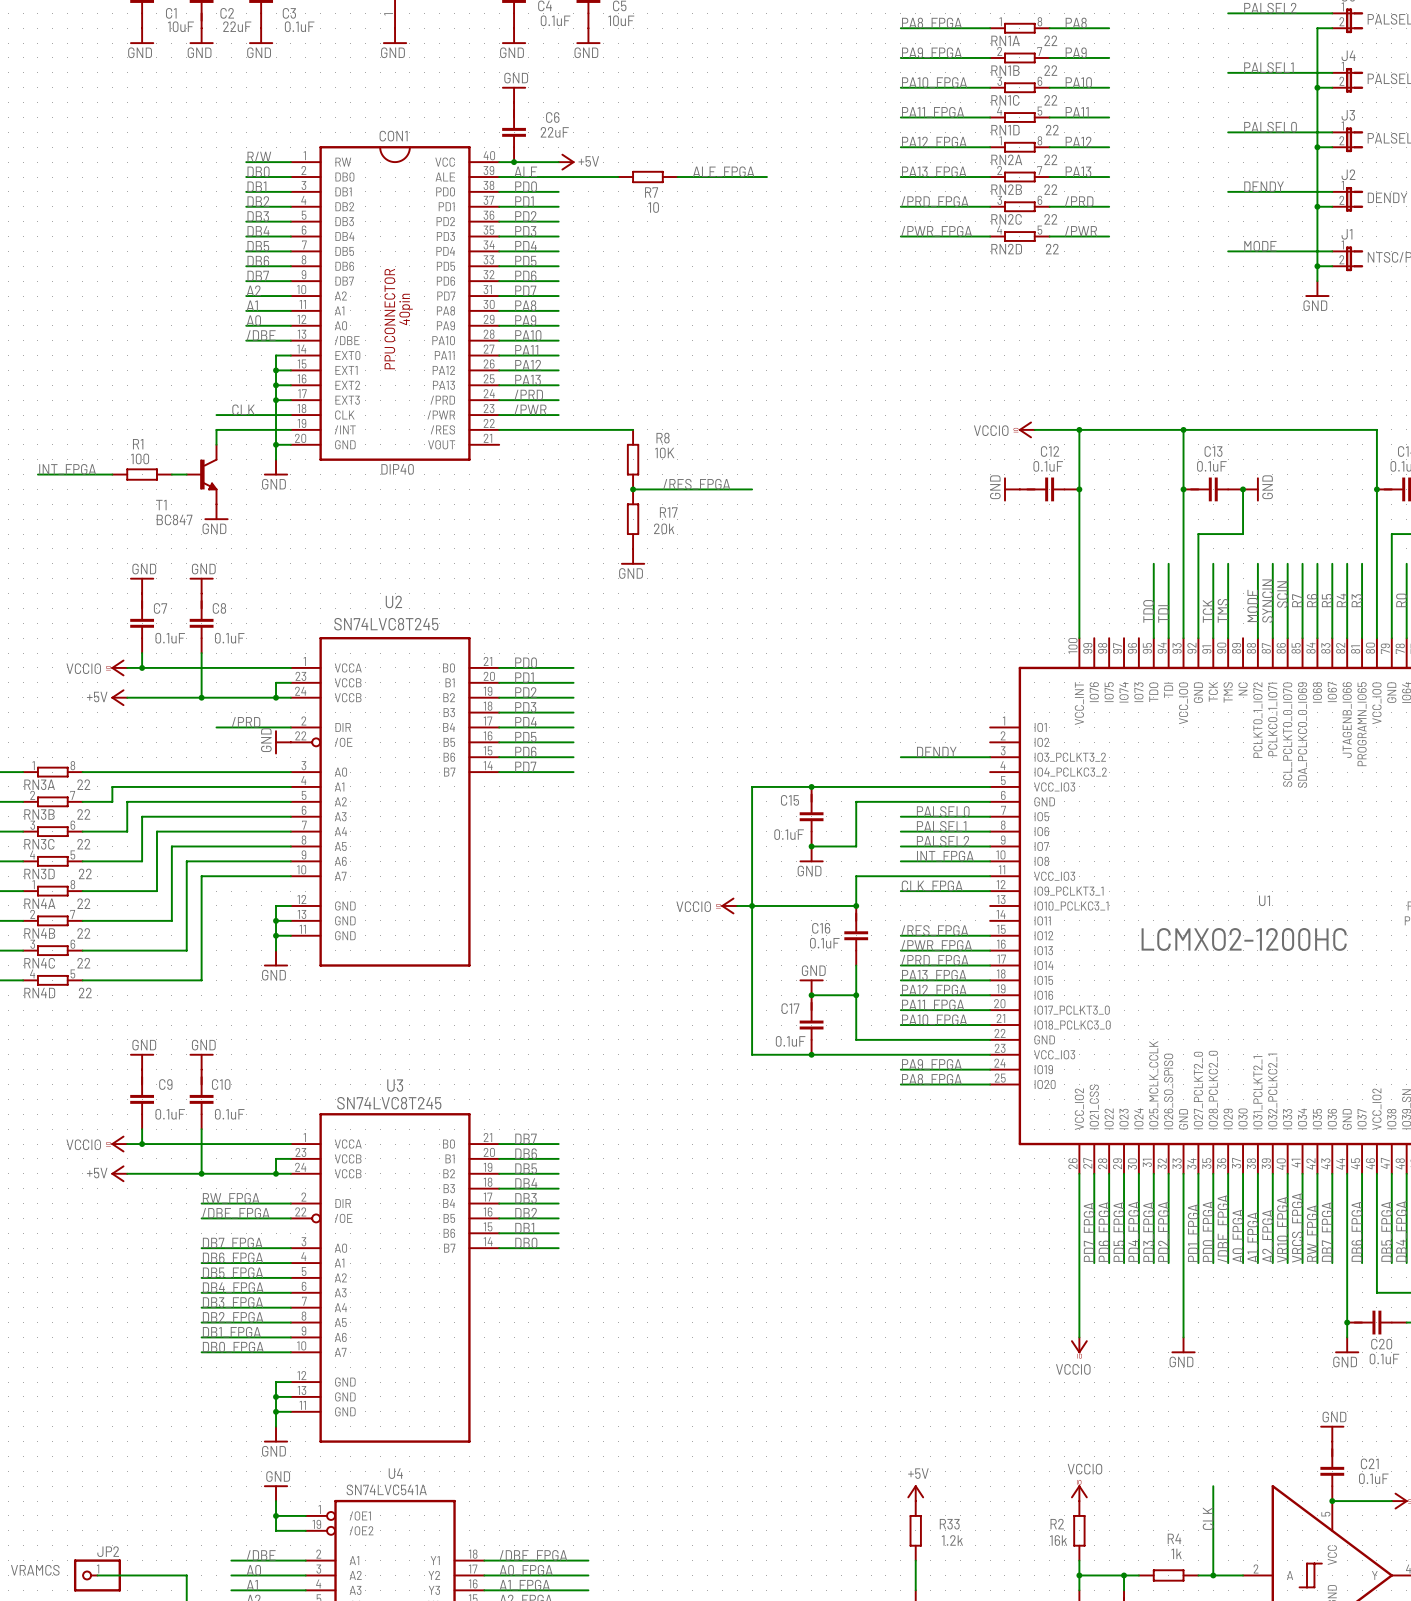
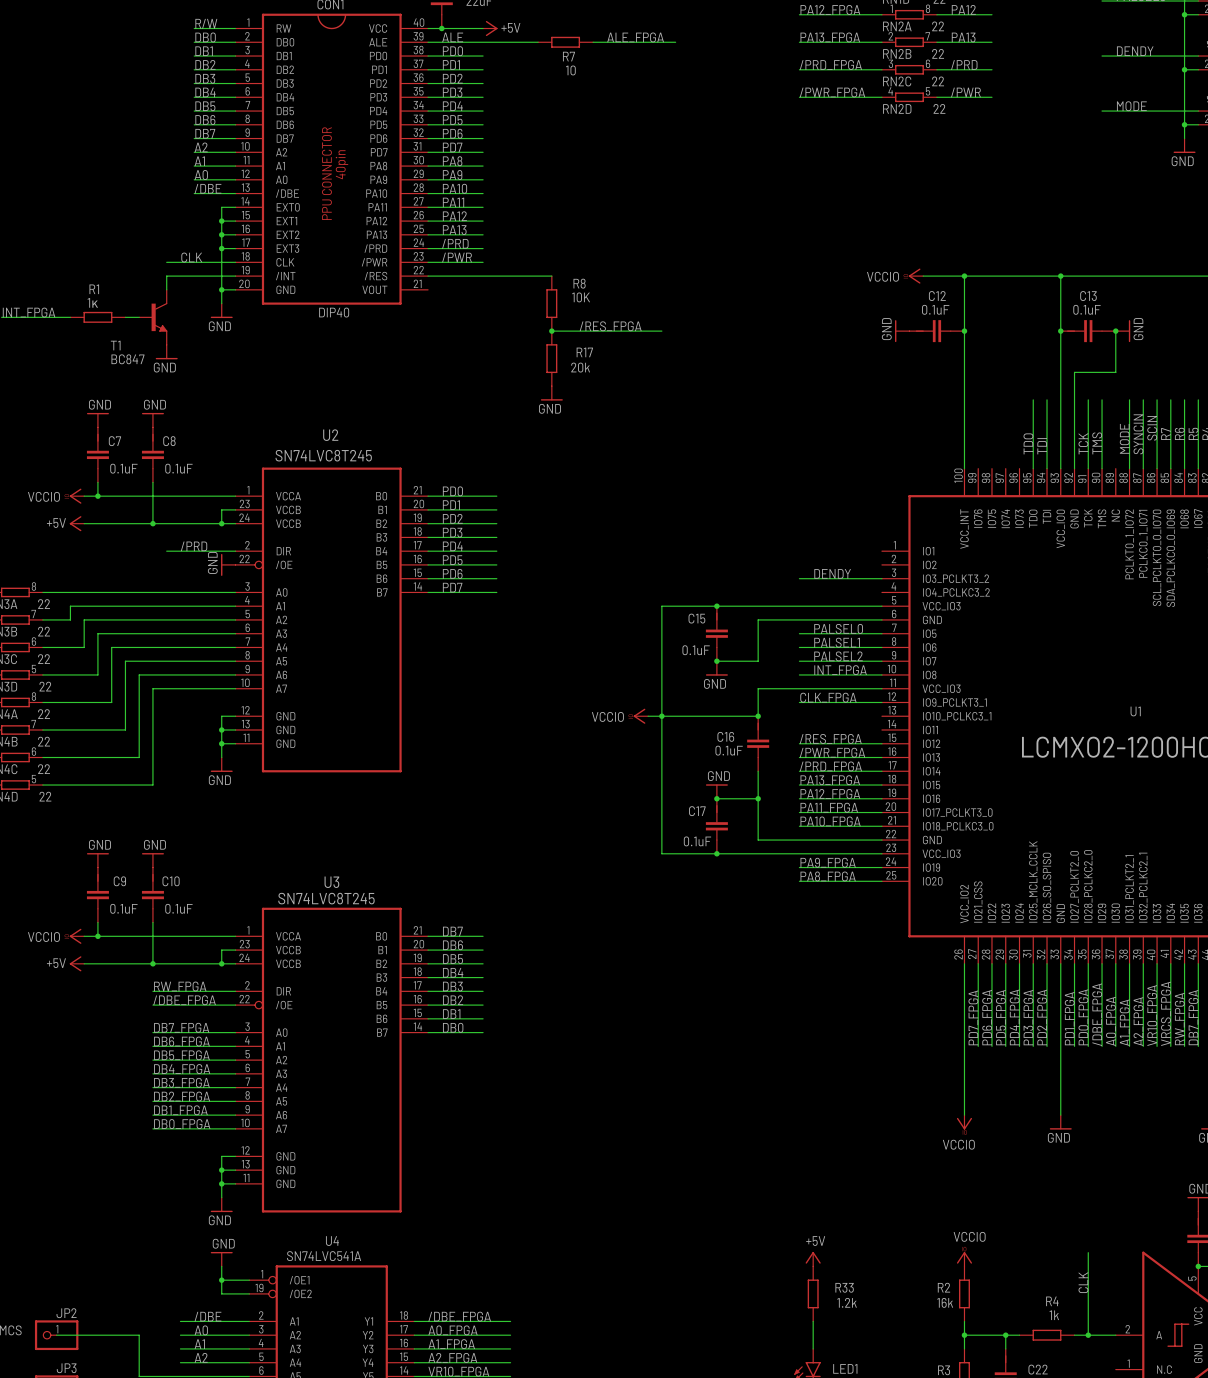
R1 value: 100 (140, 458) -> 1к (92, 302)

